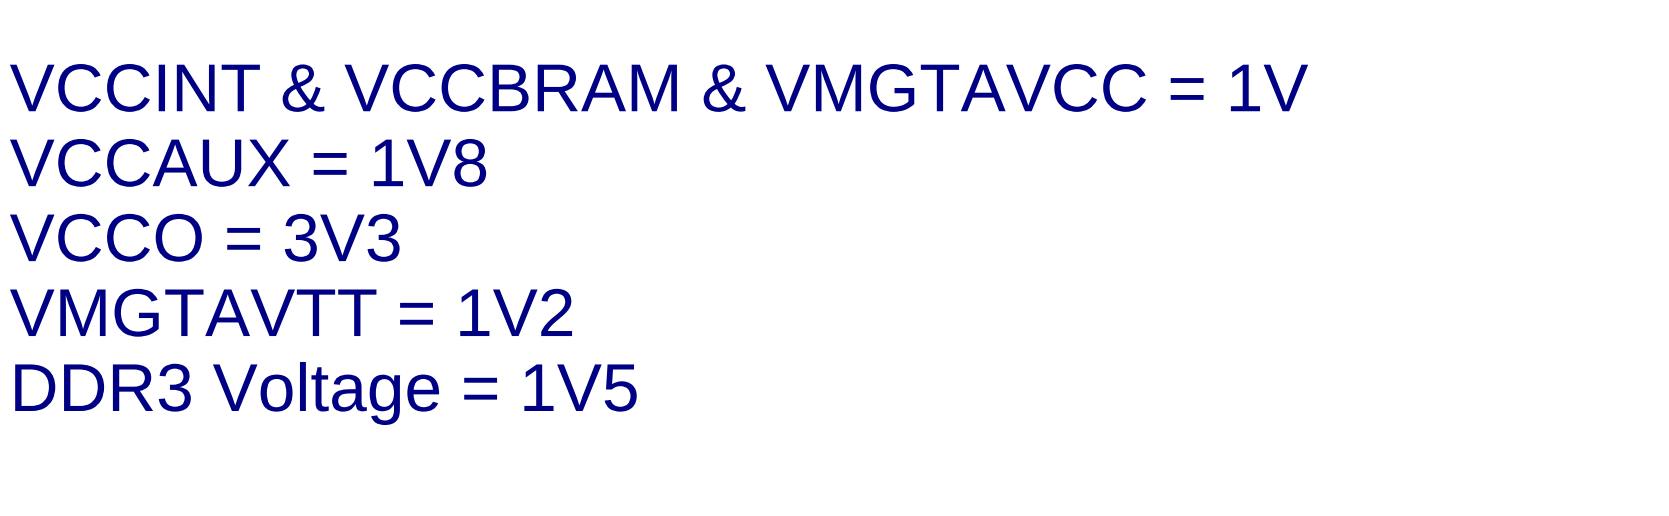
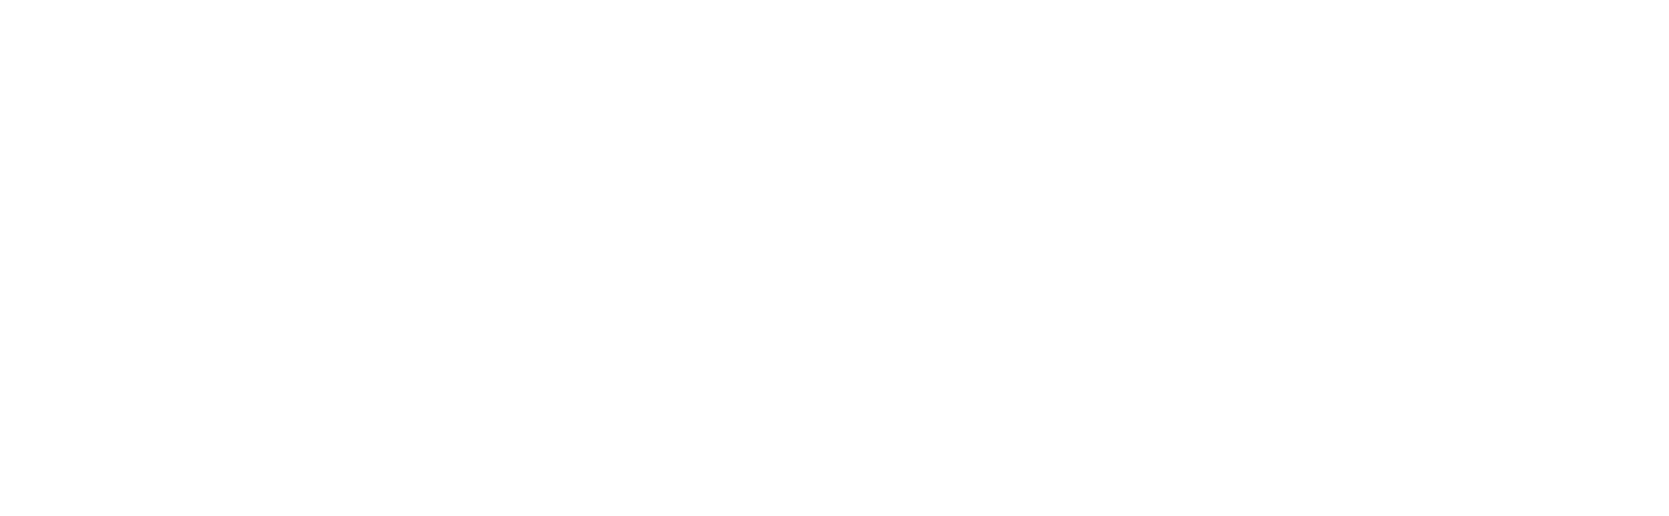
text: VCCINT & VCCBRAM & VMGTAVCC = 1V (659, 87) -> none
text: VCCAUX = 1V8 (248, 162) -> none
text: VCCO = 3V3 (204, 237) -> none
text: VMGTAVTT = 1V2 (291, 312) -> none
text: DDR3 Voltage = 1V5 (325, 393) -> none

